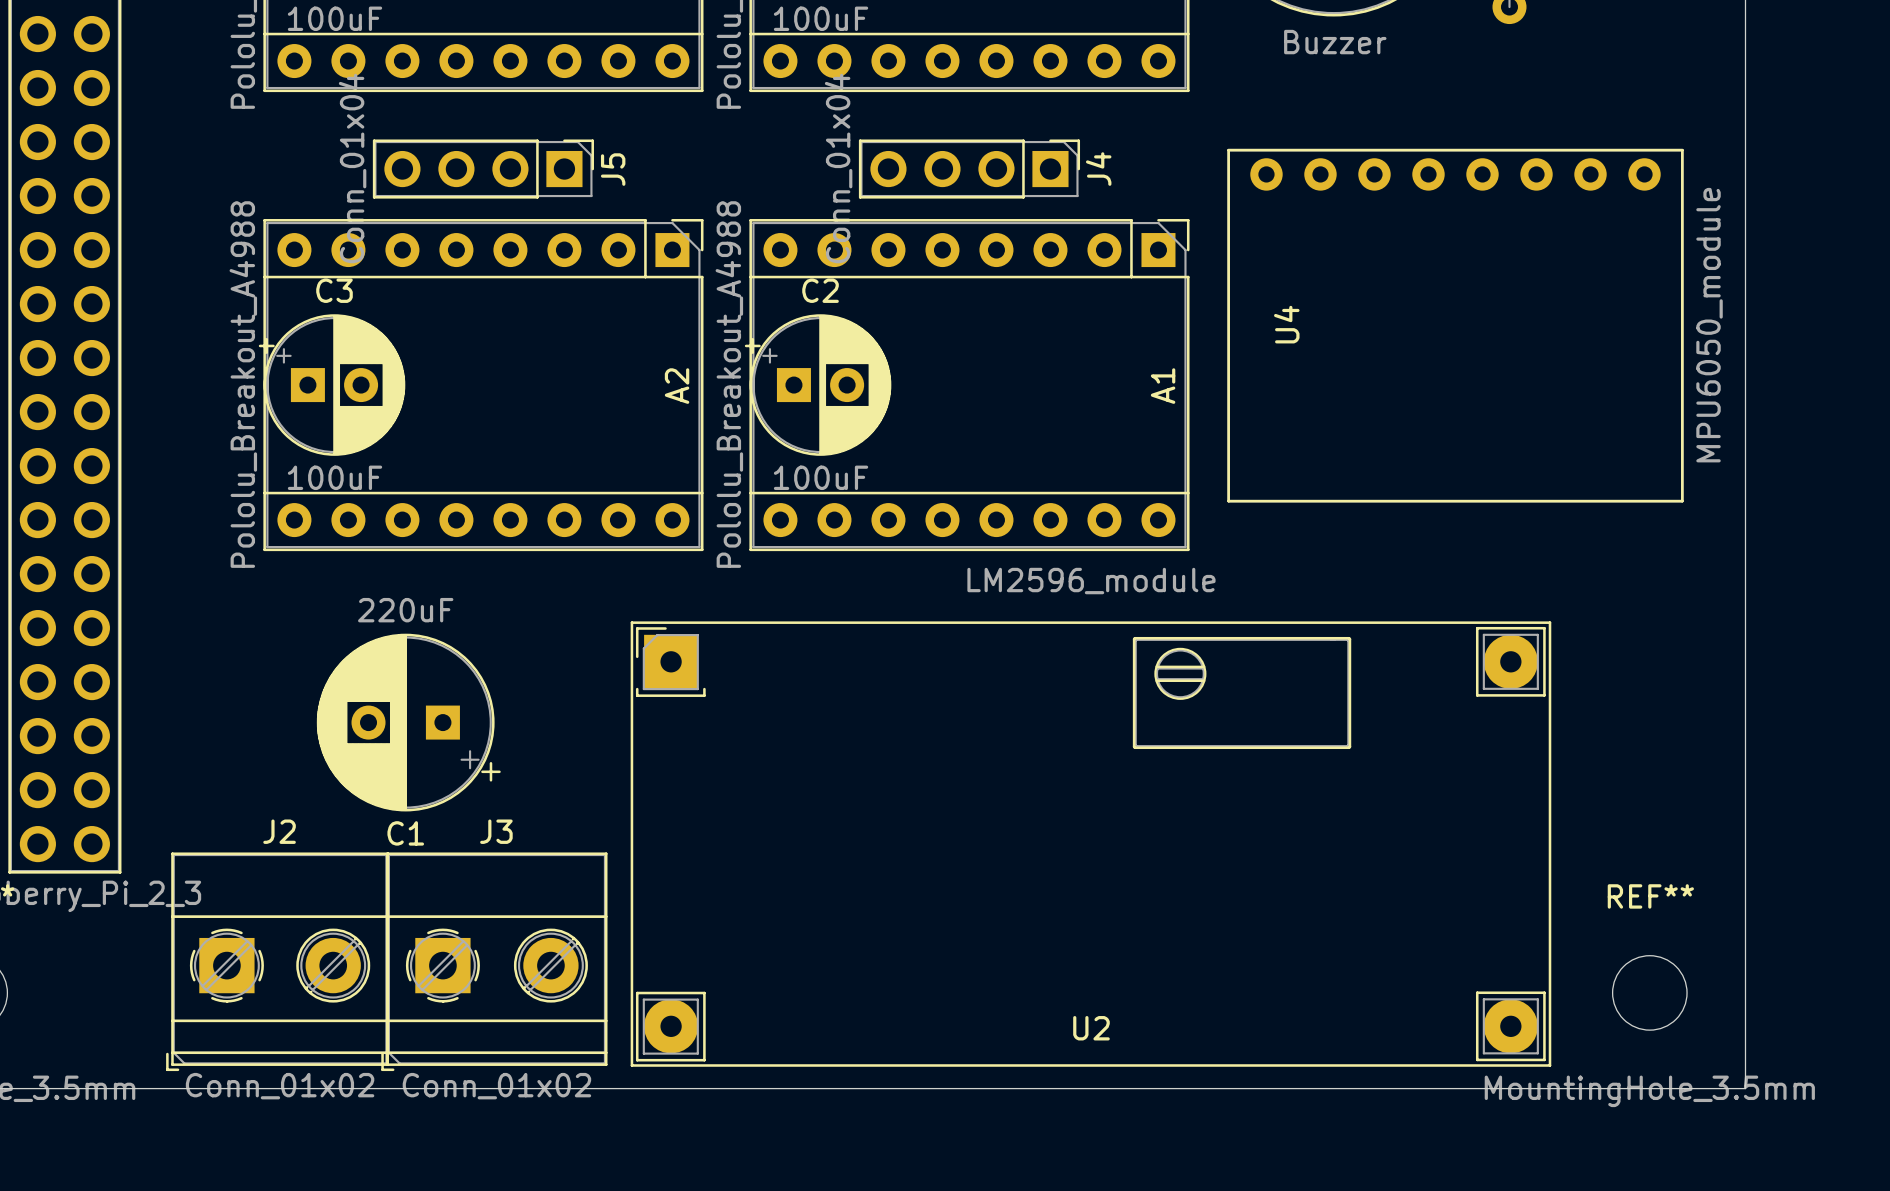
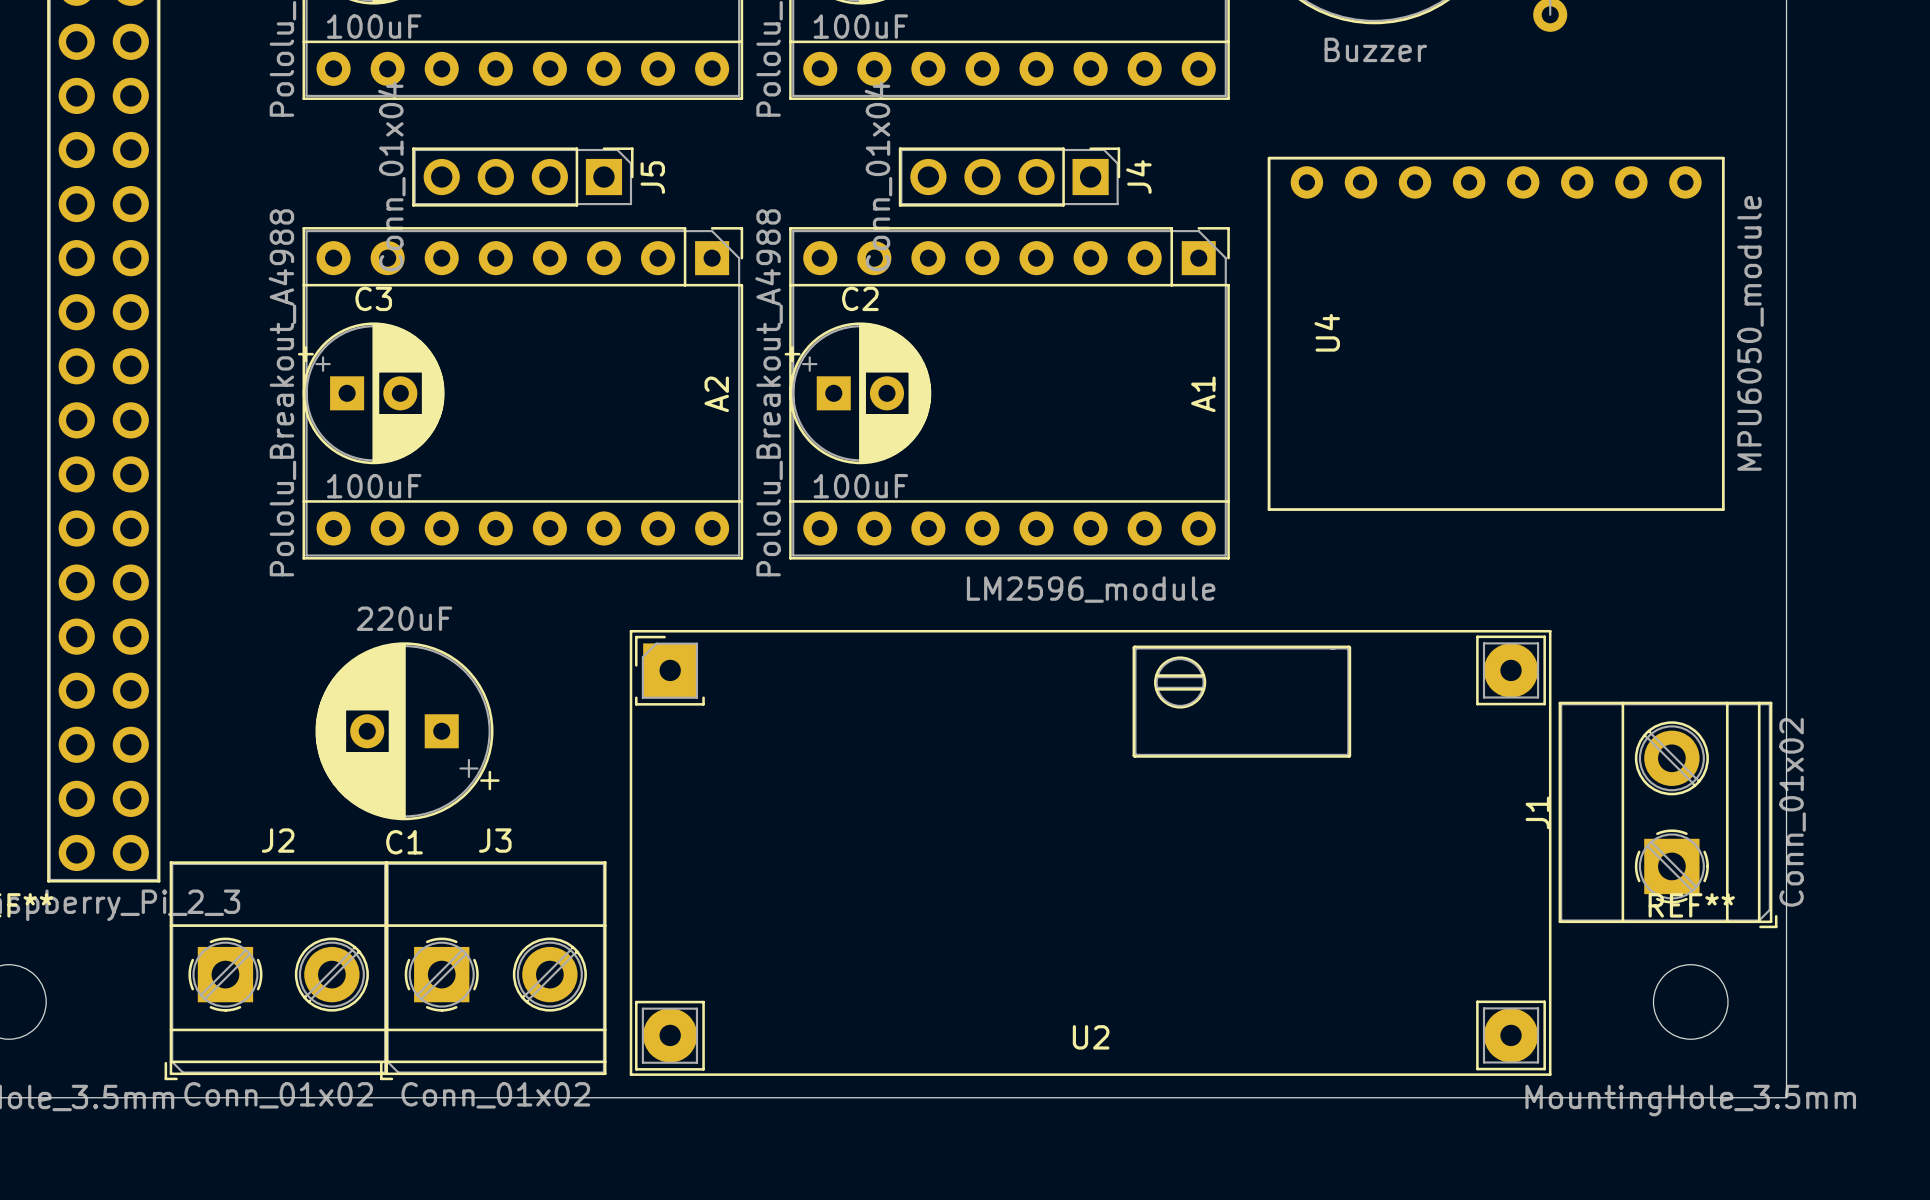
C1 position: (408, 722) -> (407, 731)
J1: none -> Conn_01x02 (1668, 814)
U2 position: (1090, 844) -> (1090, 852)
J2 position: (277, 961) -> (276, 970)
J3 position: (494, 961) -> (493, 970)

